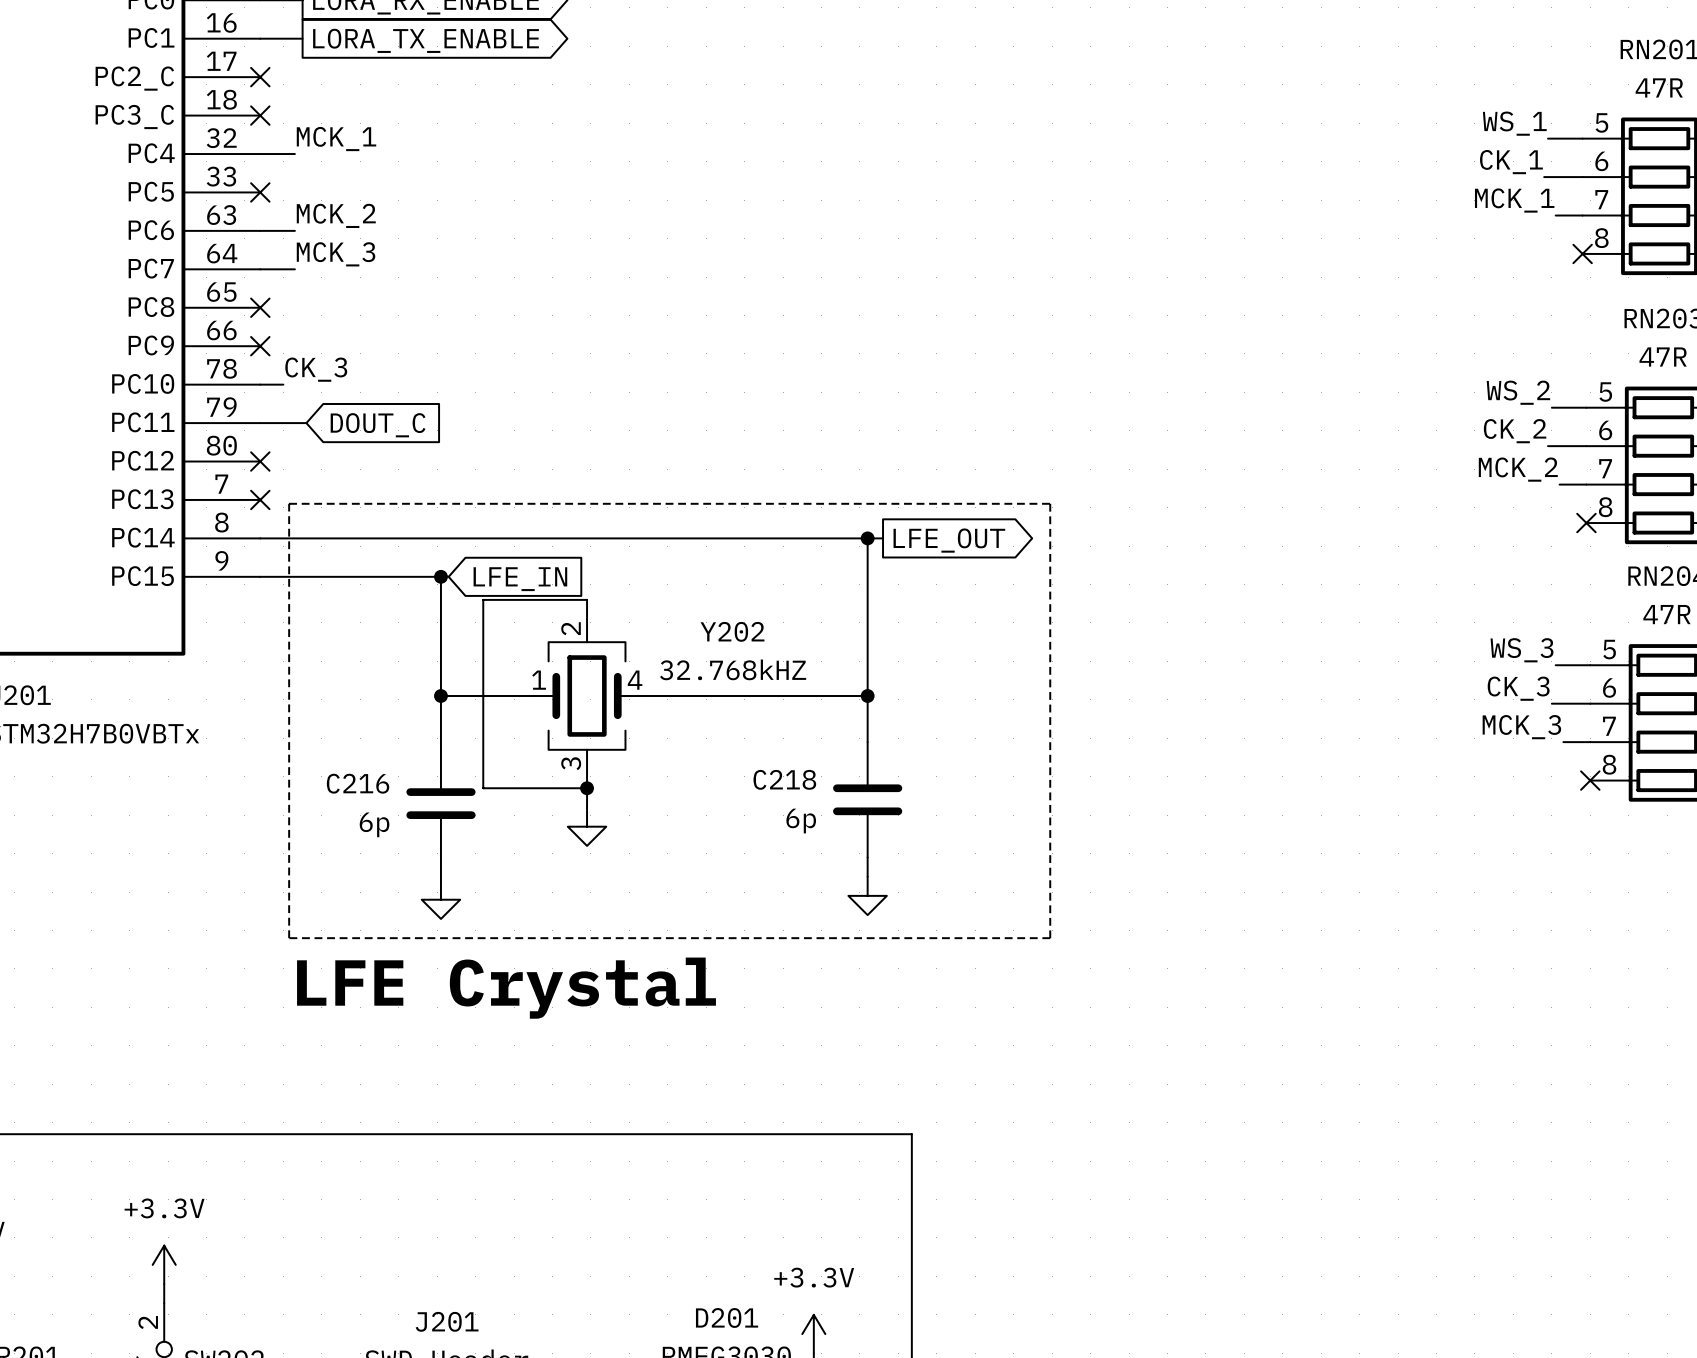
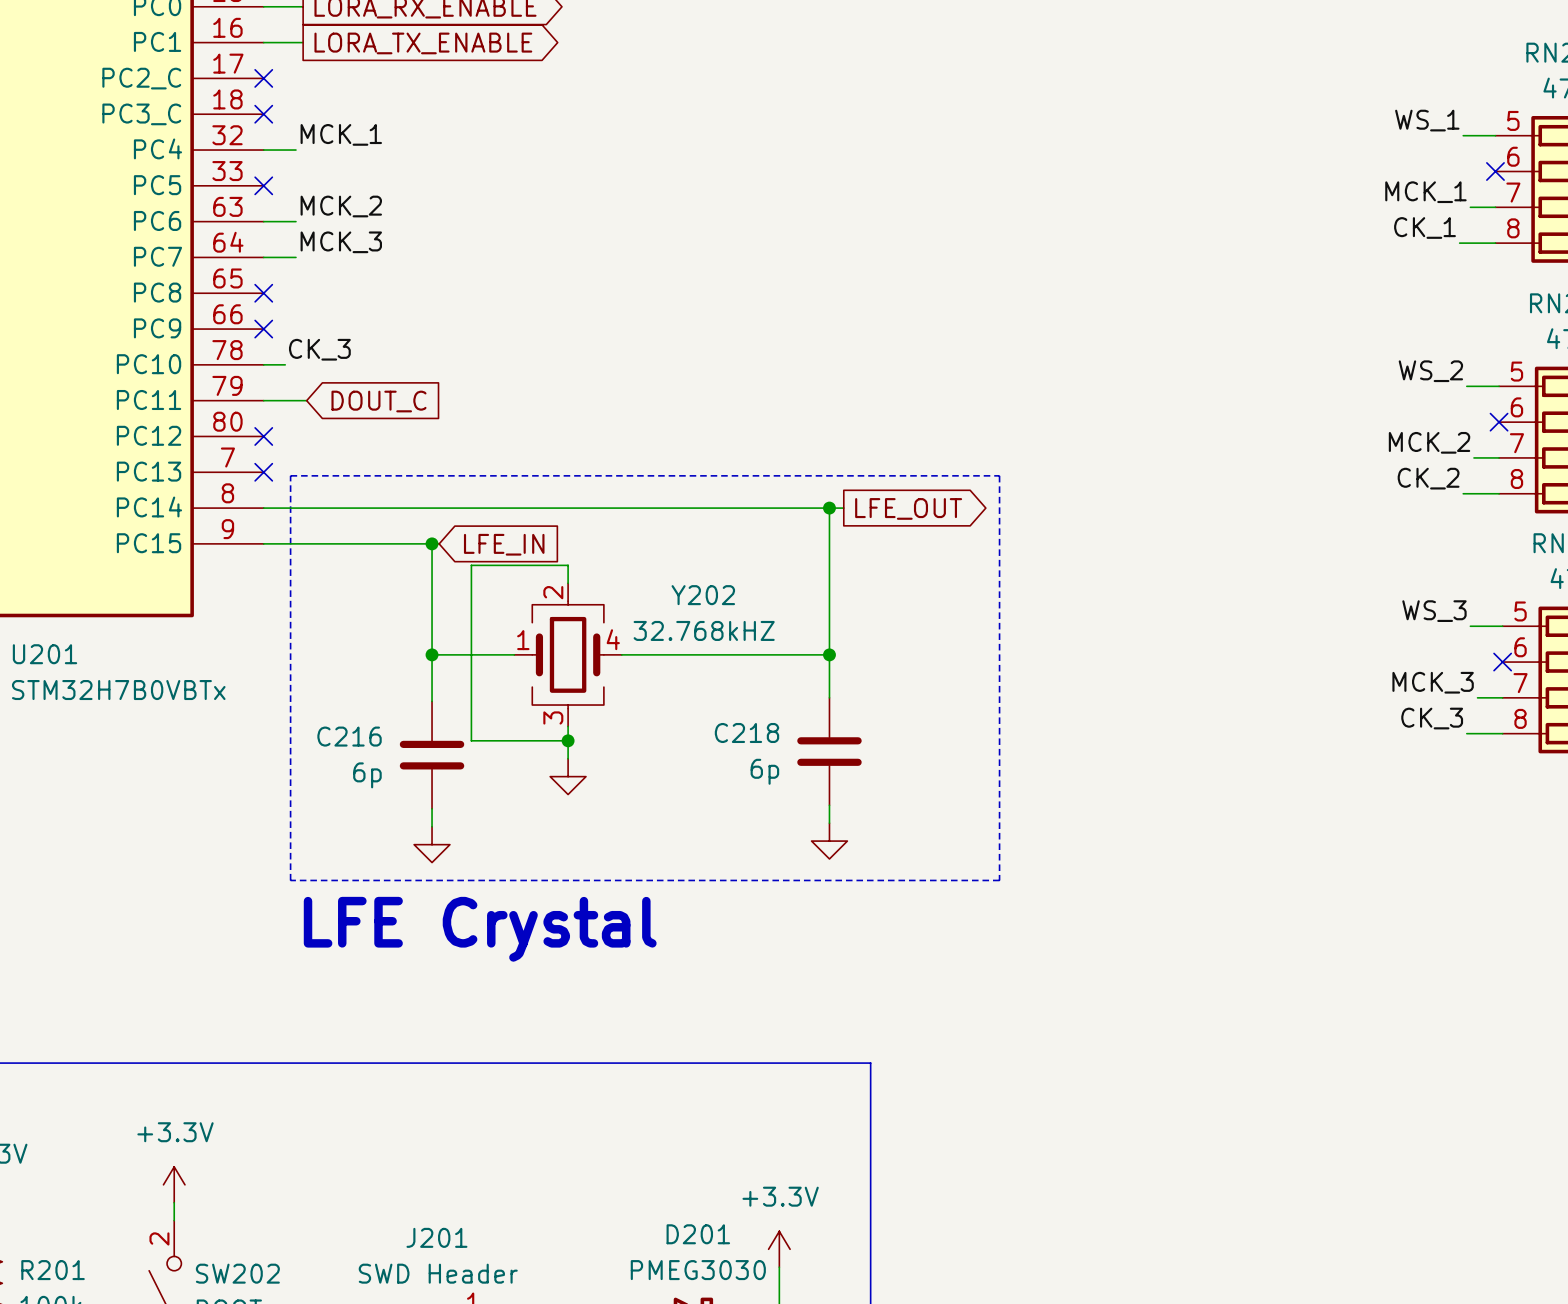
label position: CK_1 (1511, 162) -> CK_1 (1425, 227)
wire: (1544, 177) (1582, 177) -> (1459, 243) (1495, 243)
no-connect mark position: (1582, 253) -> (1495, 171)
label position: CK_2 (1515, 431) -> CK_2 (1428, 478)
wire: (1548, 446) (1586, 446) -> (1463, 493) (1499, 493)
no-connect mark position: (1586, 523) -> (1499, 422)
label position: CK_3 (1518, 688) -> CK_3 (1432, 718)
wire: (1551, 703) (1590, 703) -> (1466, 733) (1502, 733)
no-connect mark position: (1590, 780) -> (1502, 662)

